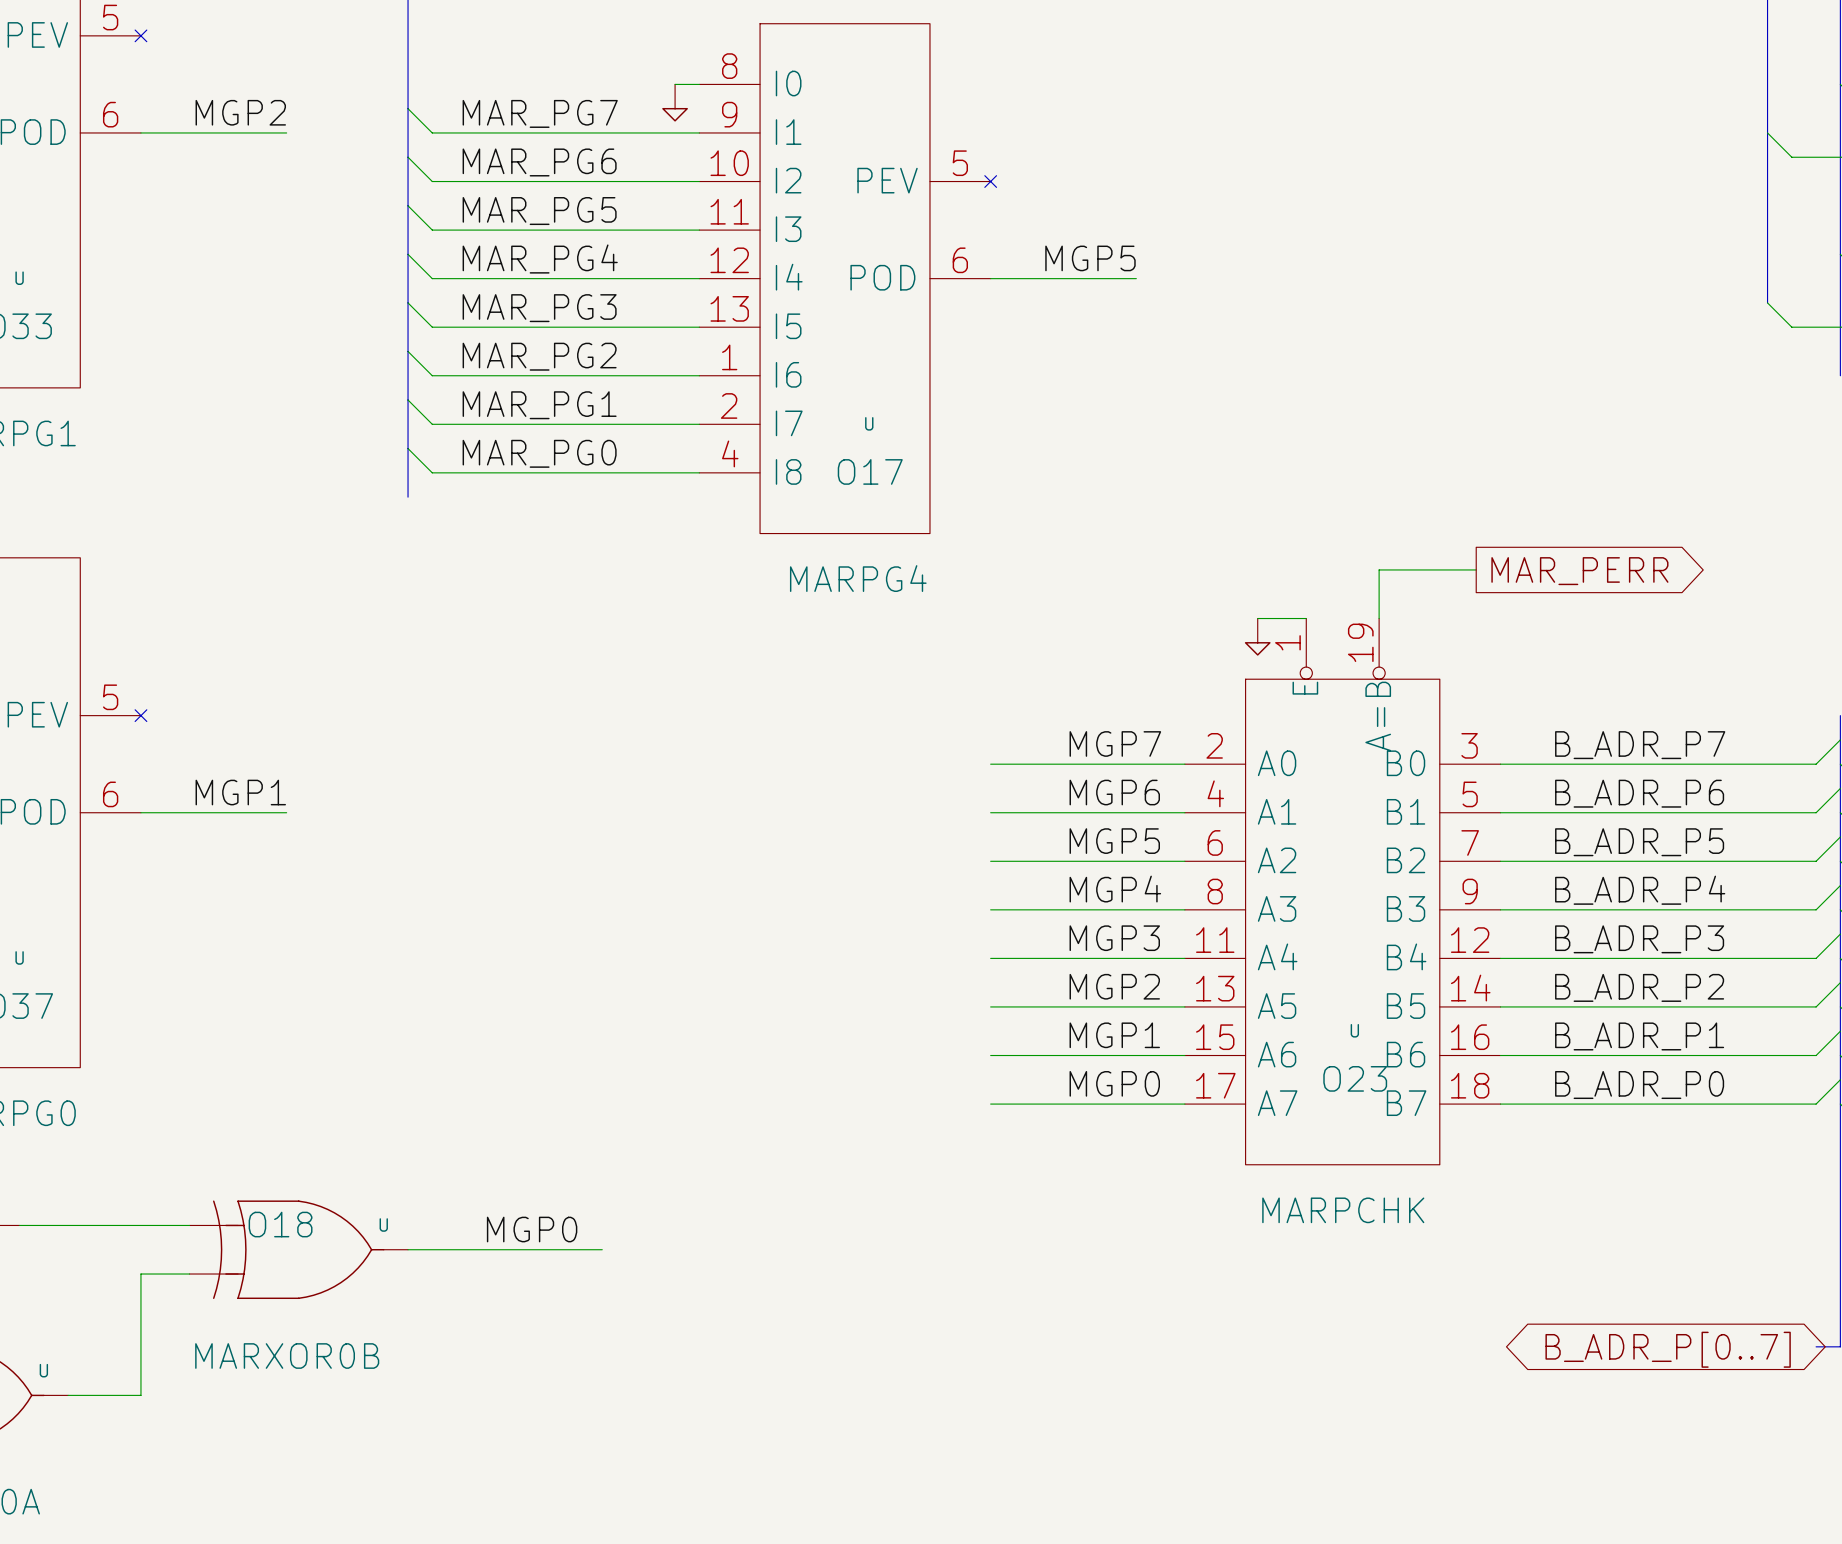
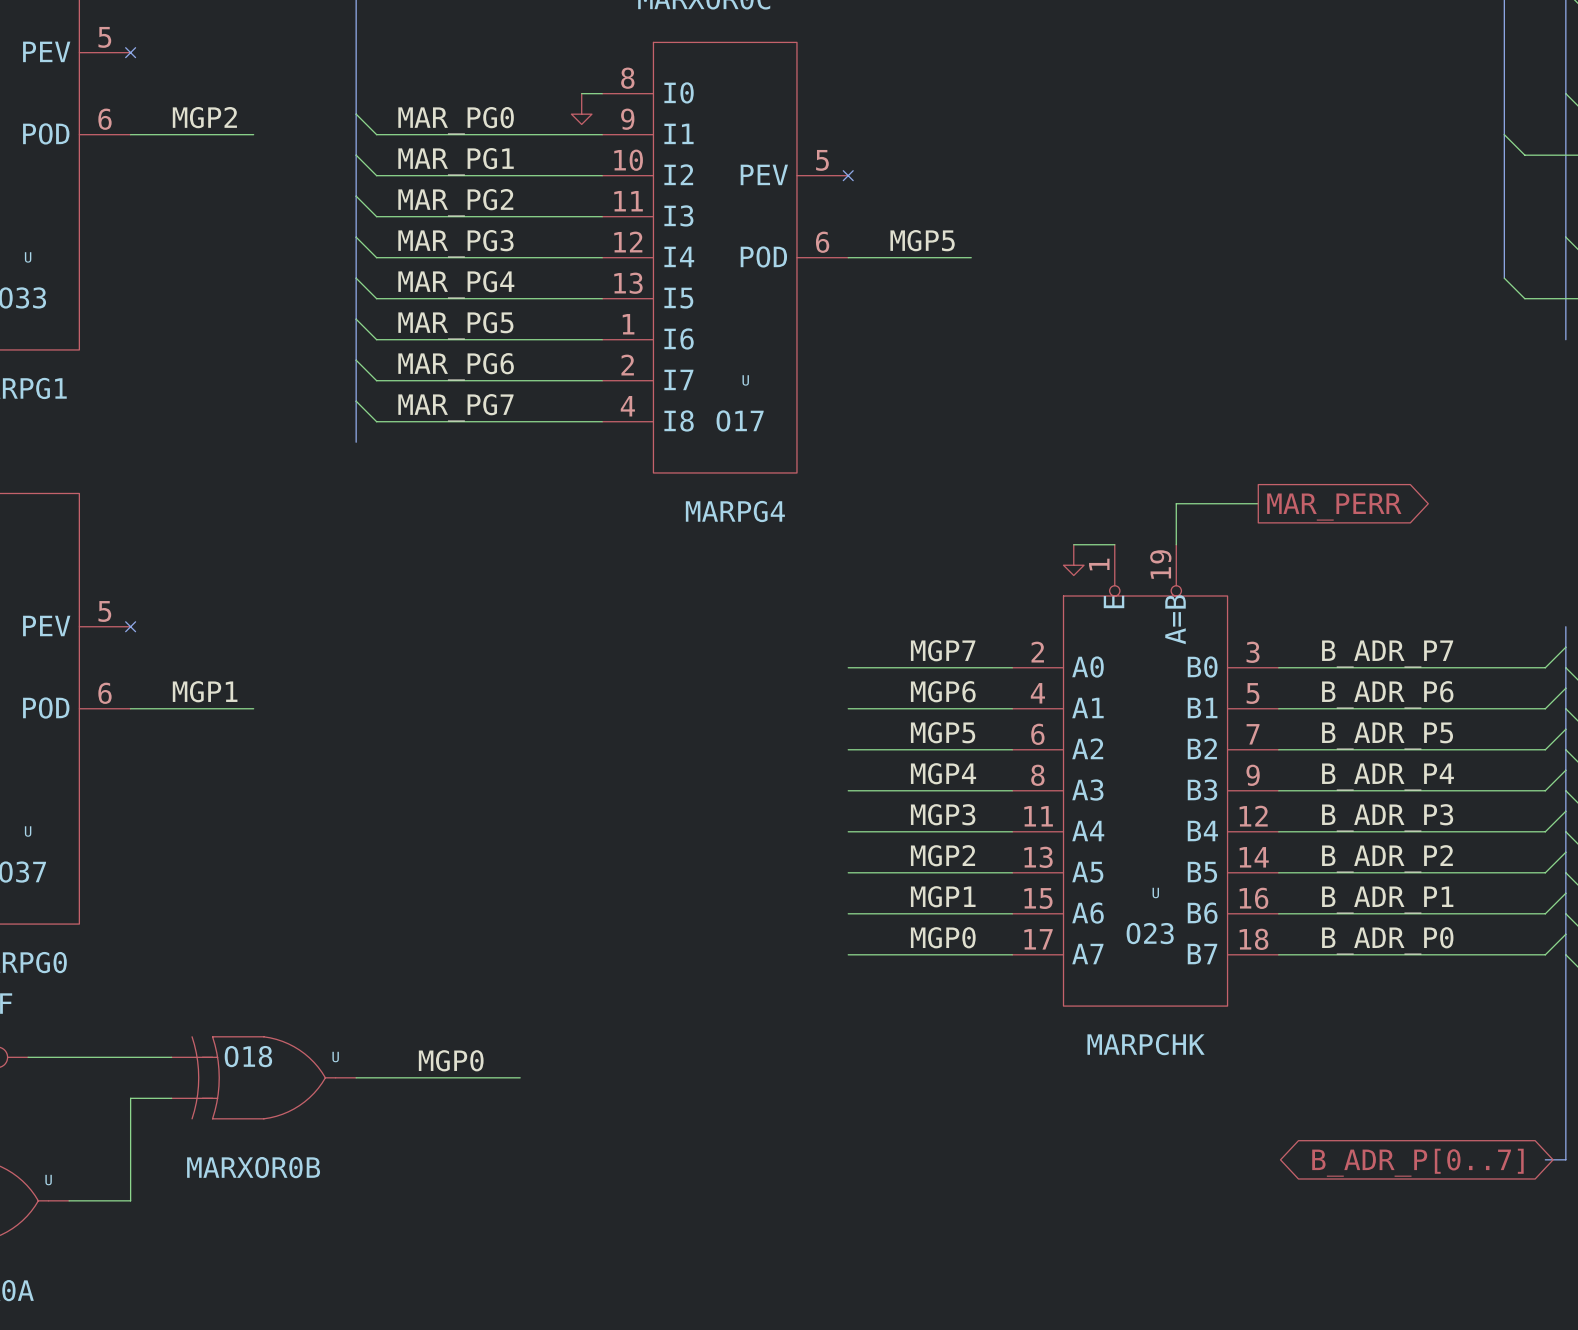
label: MAR_PG7 (540, 113) -> MAR_PG0 (456, 120)
label: MAR_PG6 (539, 162) -> MAR_PG1 (456, 161)
label: MAR_PG5 (539, 211) -> MAR_PG2 (455, 202)
label: MAR_PG4 (540, 259) -> MAR_PG3 (455, 243)
label: MAR_PG3 (539, 308) -> MAR_PG4 (456, 284)
label: MAR_PG2 (539, 356) -> MAR_PG5 (455, 325)
label: MAR_PG1 (539, 405) -> MAR_PG6 (456, 366)
label: MAR_PG0 (539, 453) -> MAR_PG7 (455, 407)

